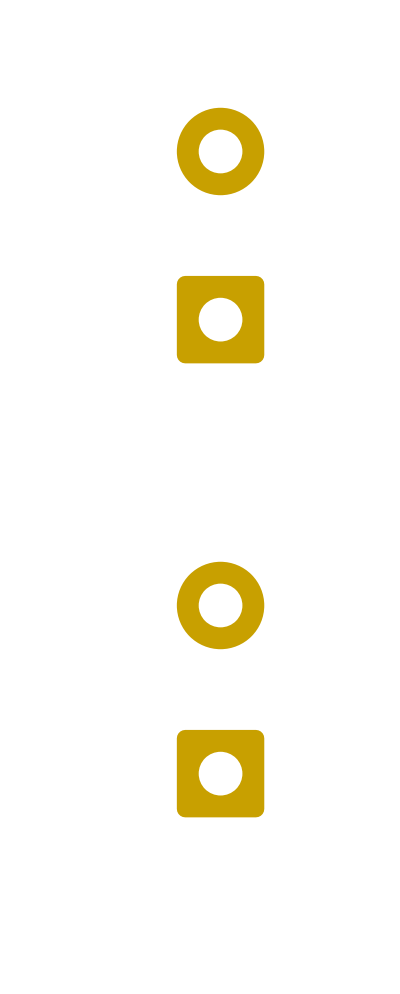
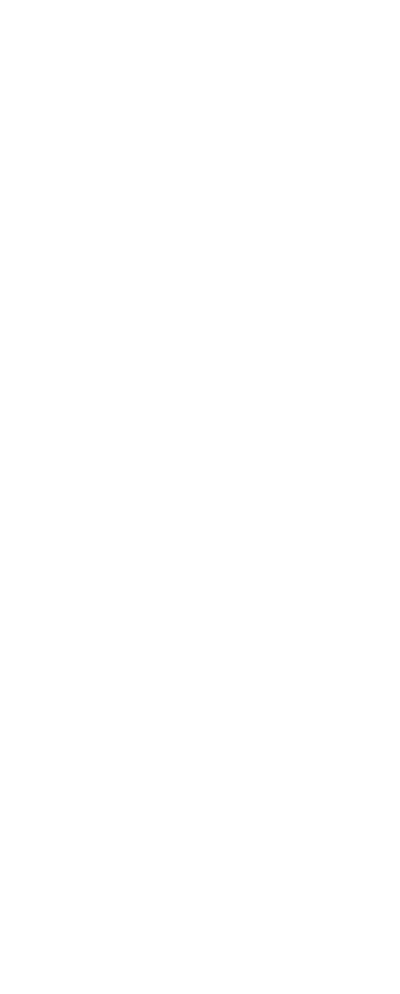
part: (220, 235) -> none
part: (220, 689) -> none

